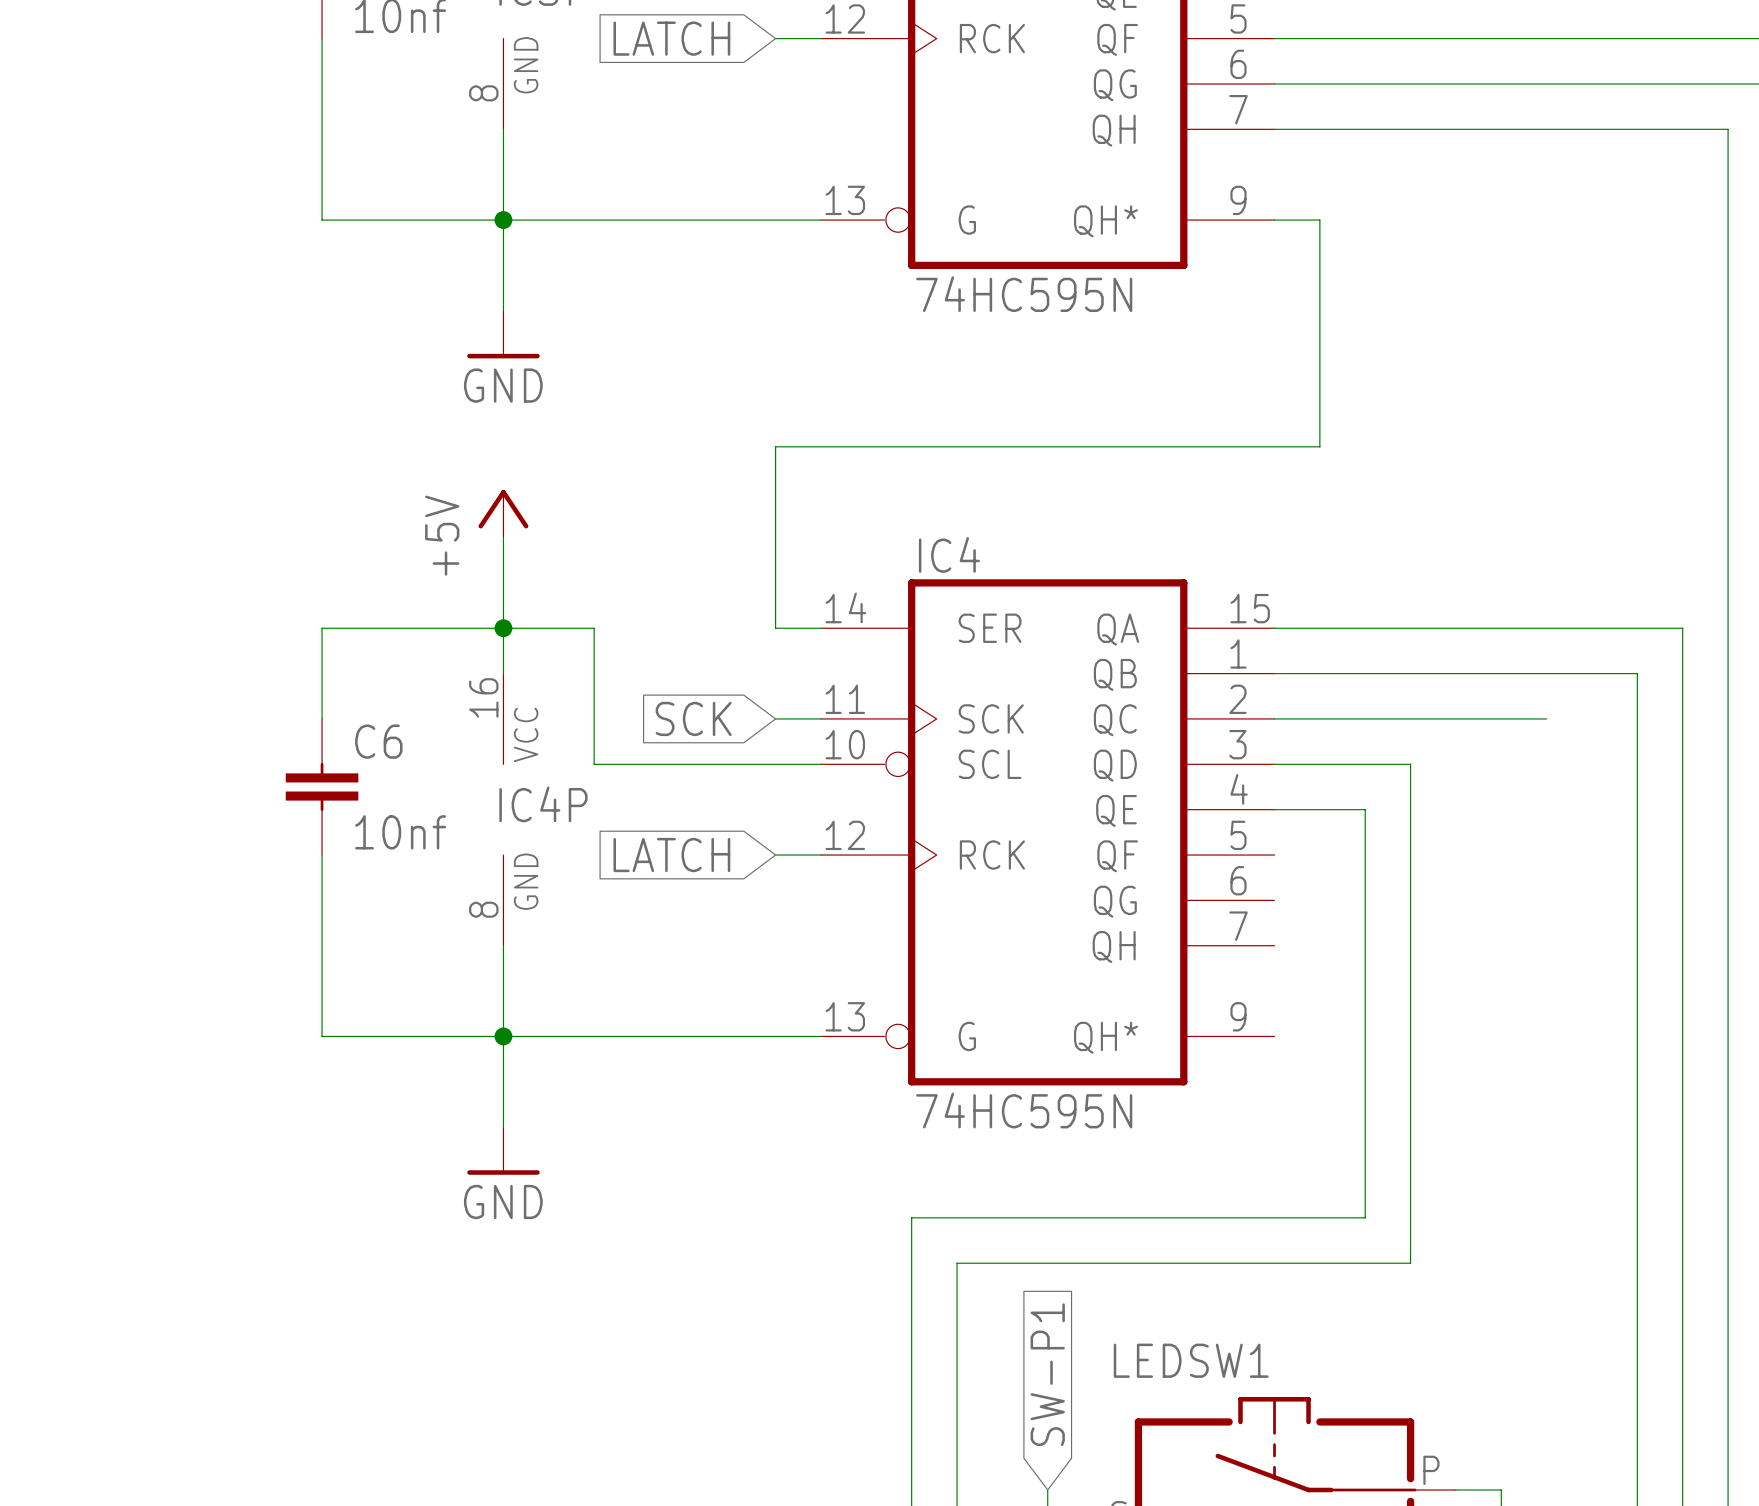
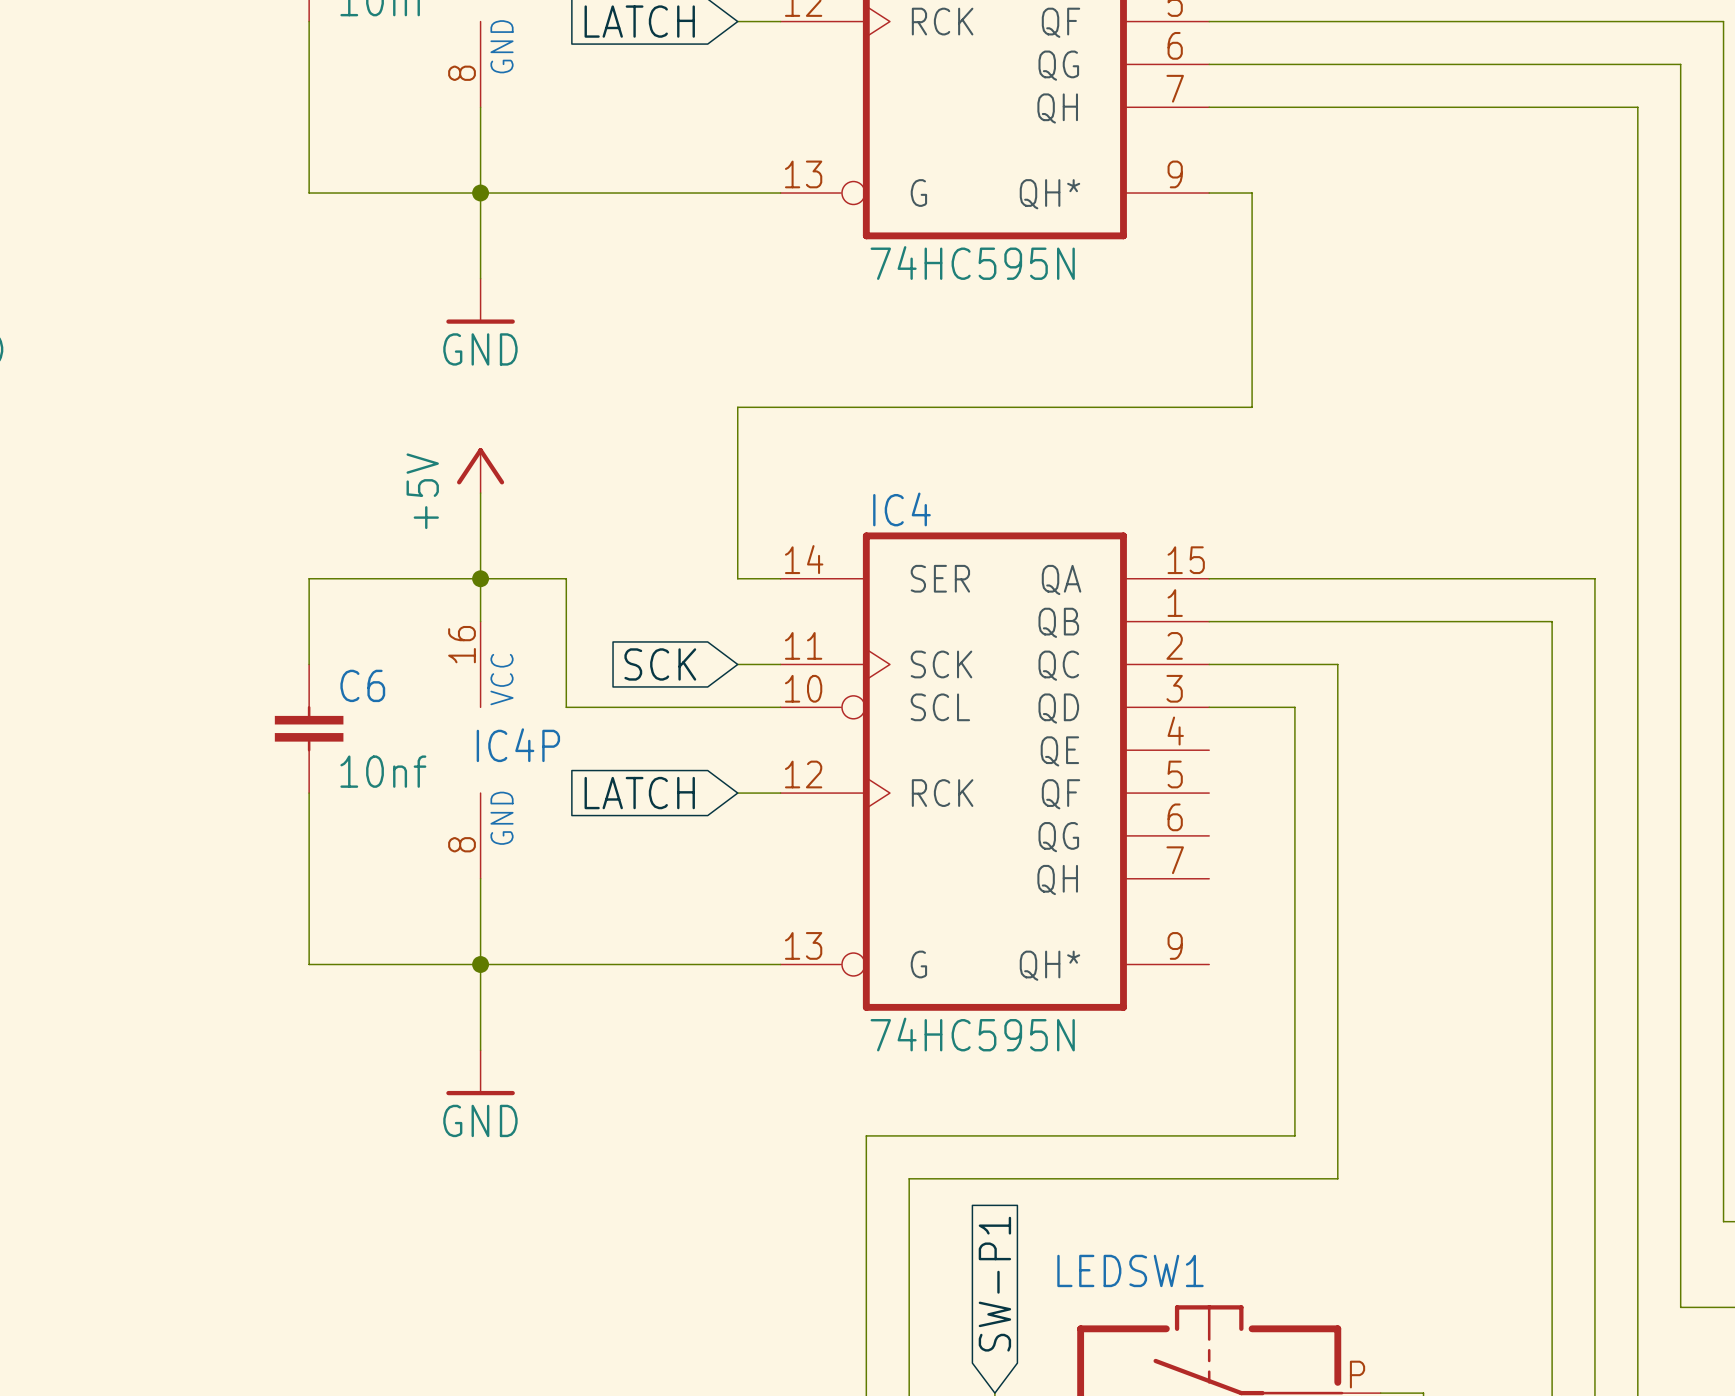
wire: (1410, 718) (1546, 718) -> none
wire: (1365, 764) (1410, 764) -> (1337, 664) (1337, 707)
wire: (1274, 809) (1365, 809) -> (1294, 707) (1294, 750)

